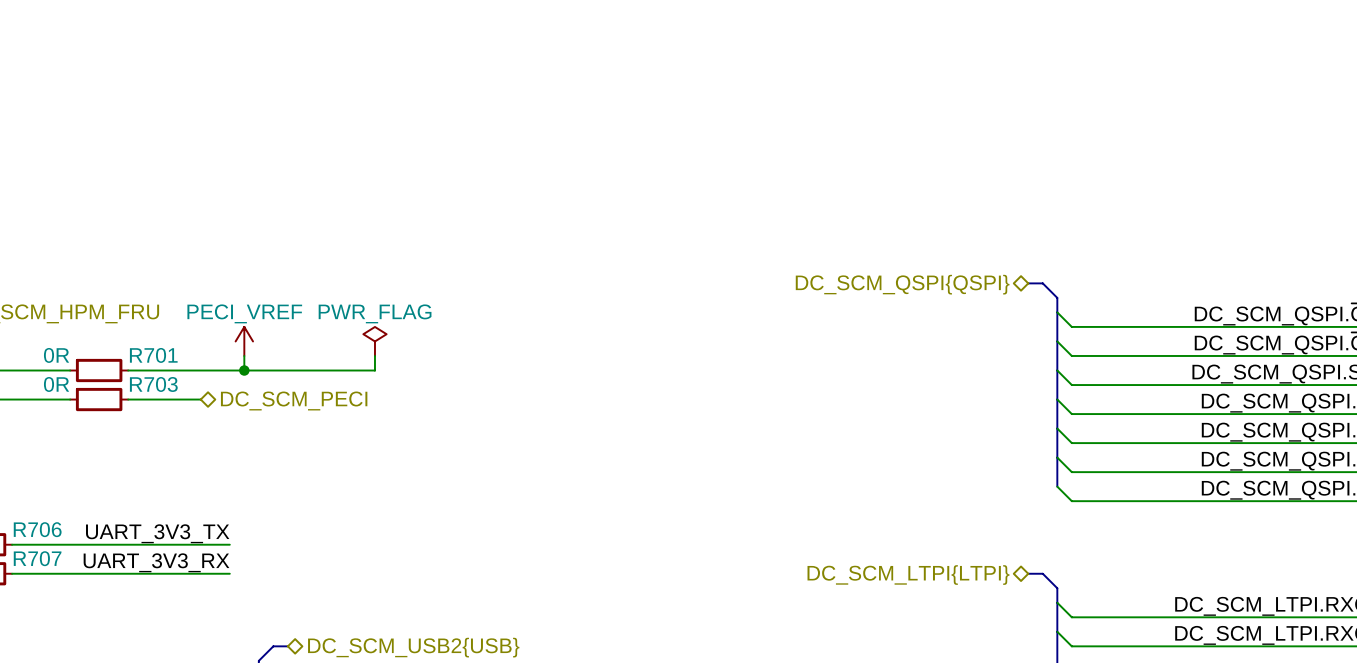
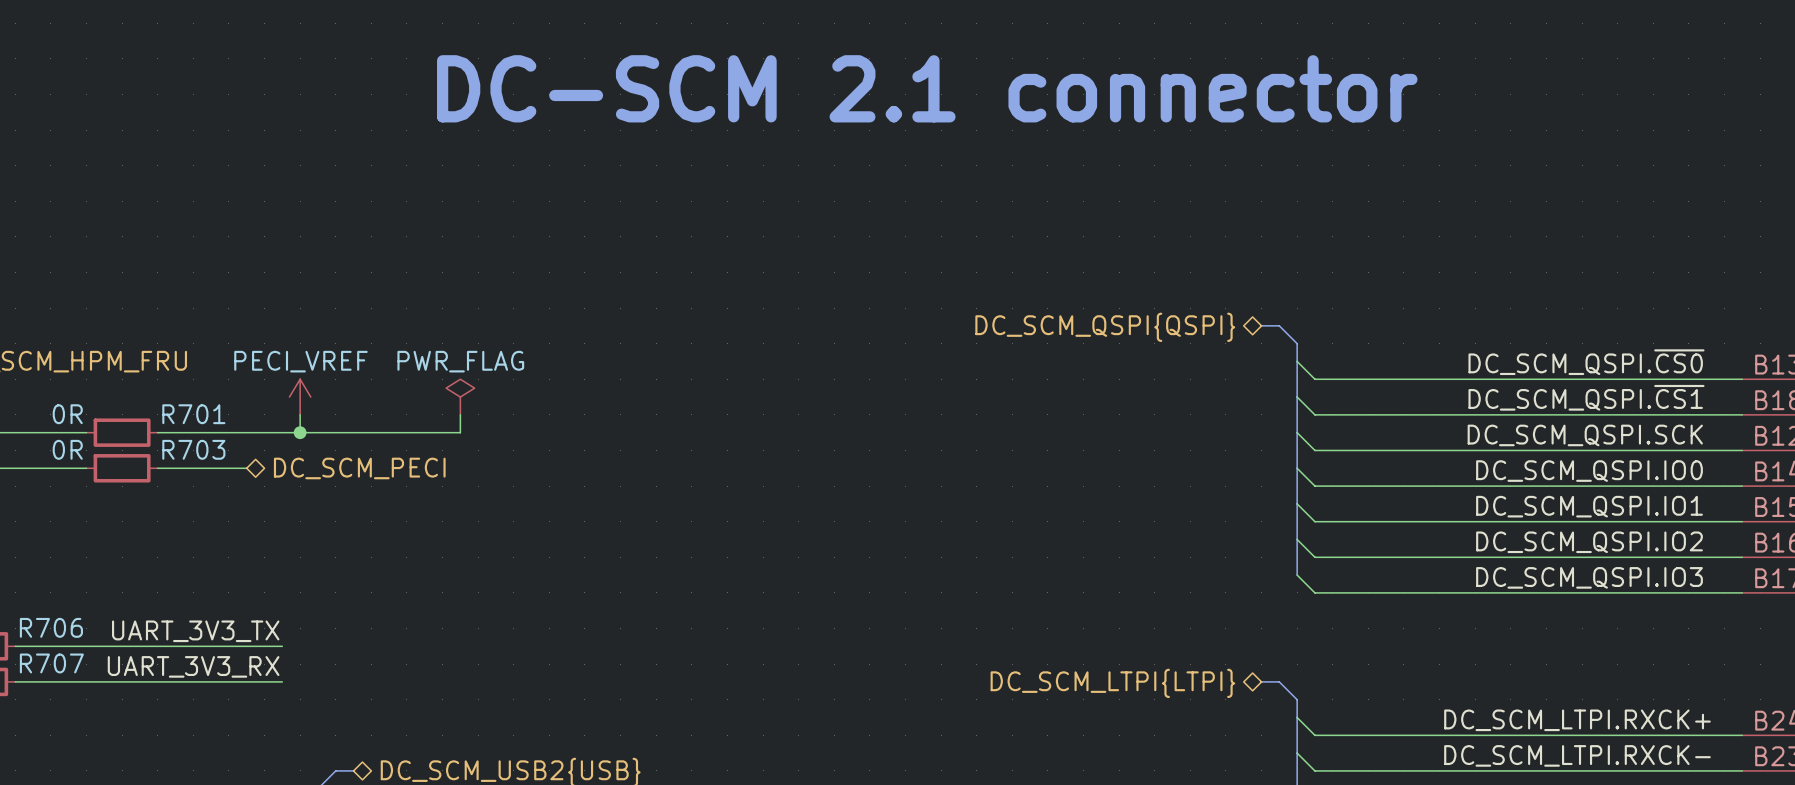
text: none -> DC-SCM 2.1 connector (927, 88)

